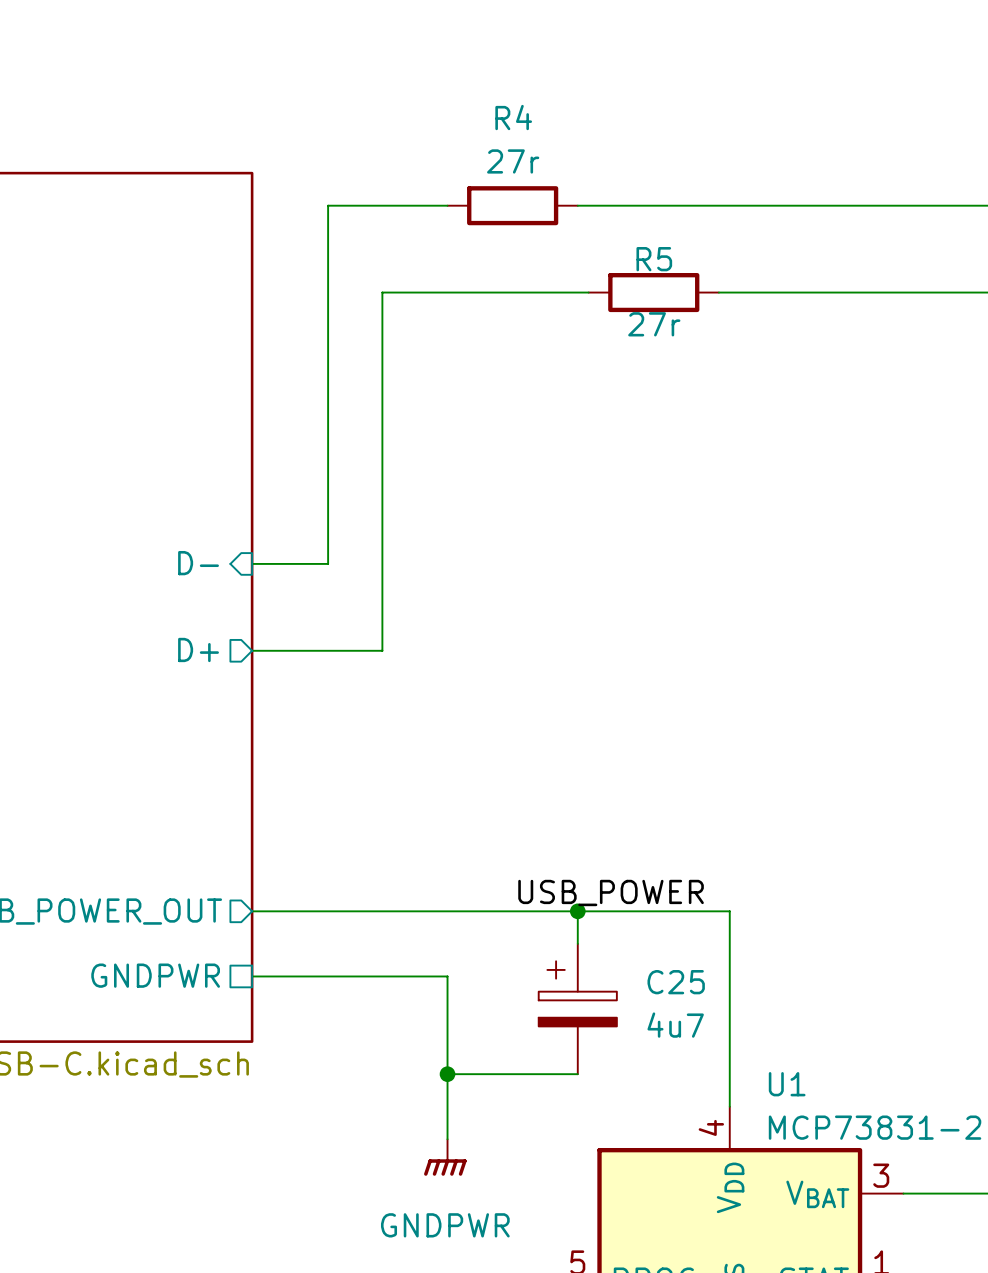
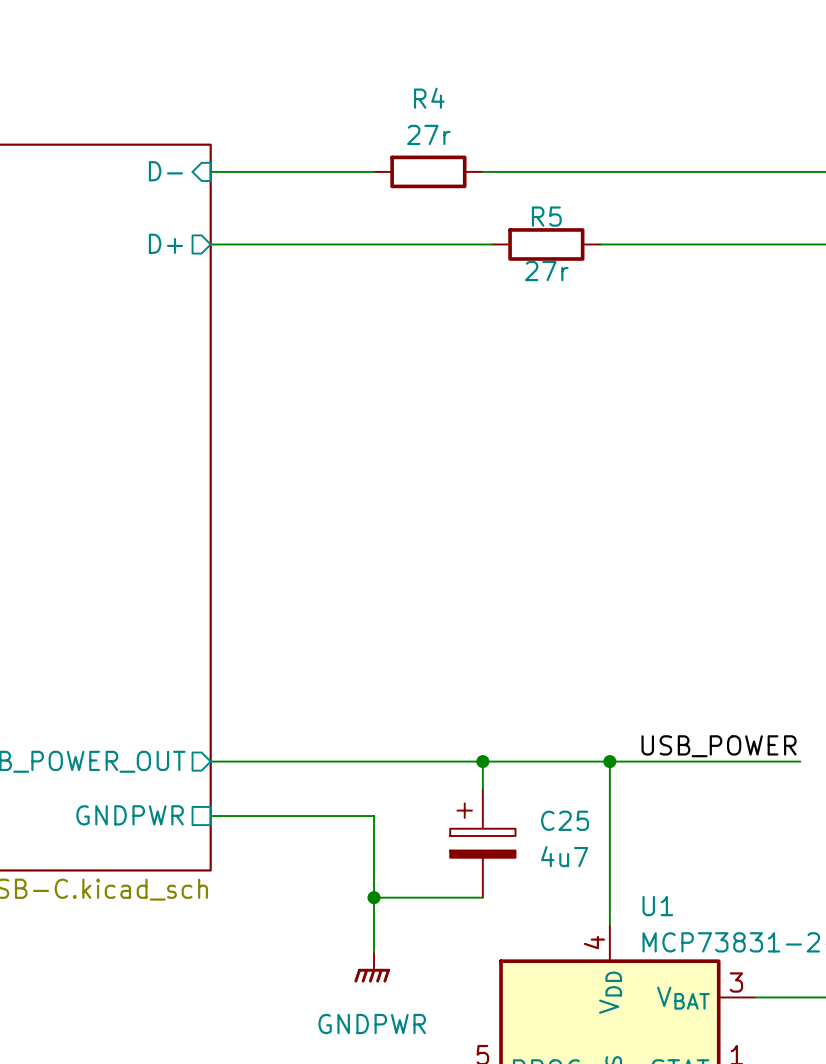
wire: (328, 205) (328, 563) (252, 563) -> (274, 171) (210, 171)
wire: (382, 292) (382, 650) (252, 650) -> (319, 244) (210, 244)
sheet pin position: D- (198, 563) -> D- (165, 171)
sheet pin position: D+ (198, 649) -> D+ (165, 243)
label: USB_POWER (611, 892) -> none
label: none -> USB_POWER (719, 746)
wire: none -> (609, 761) (800, 761)
junction: none -> (609, 761)

